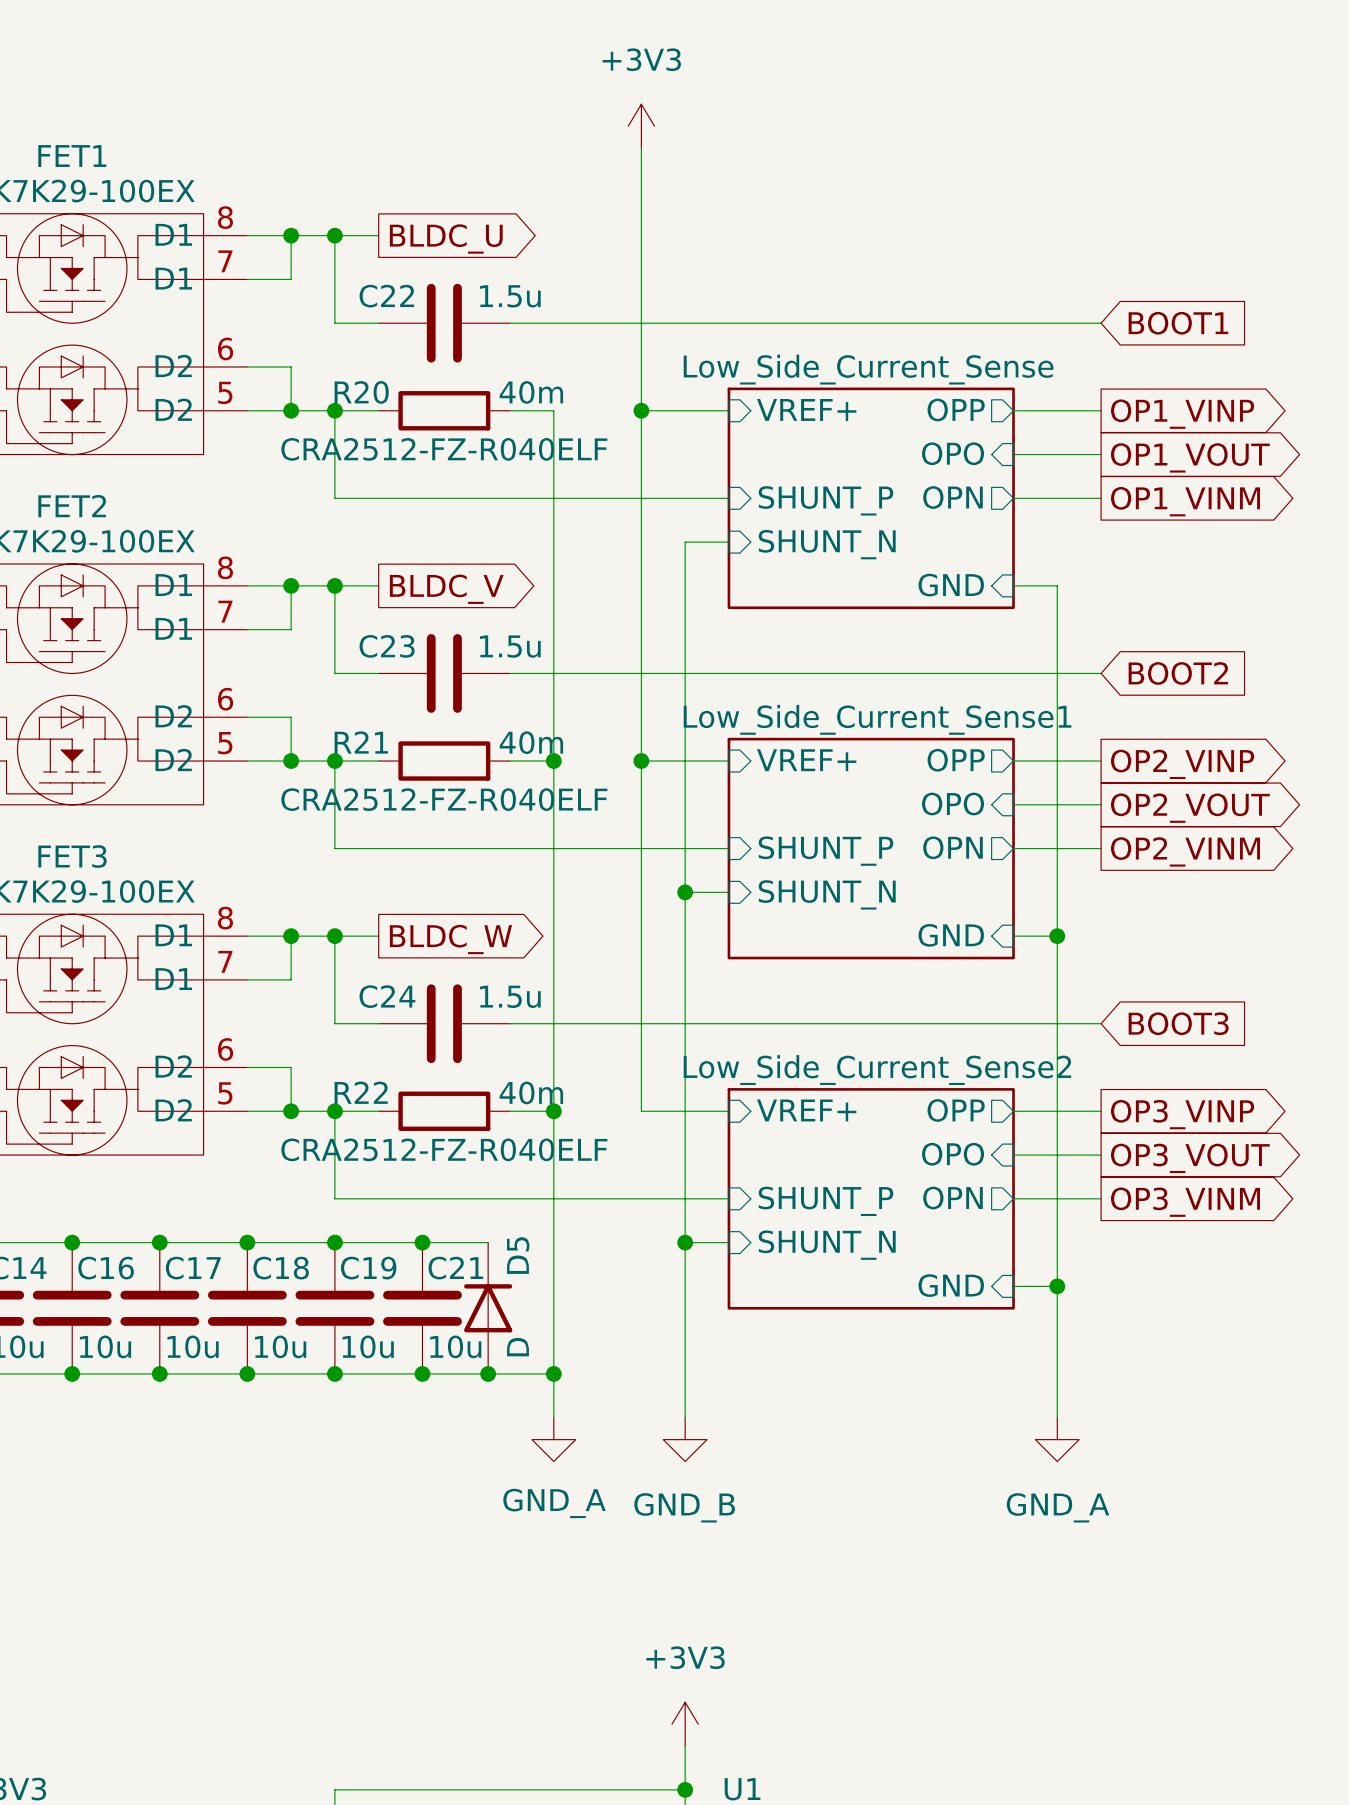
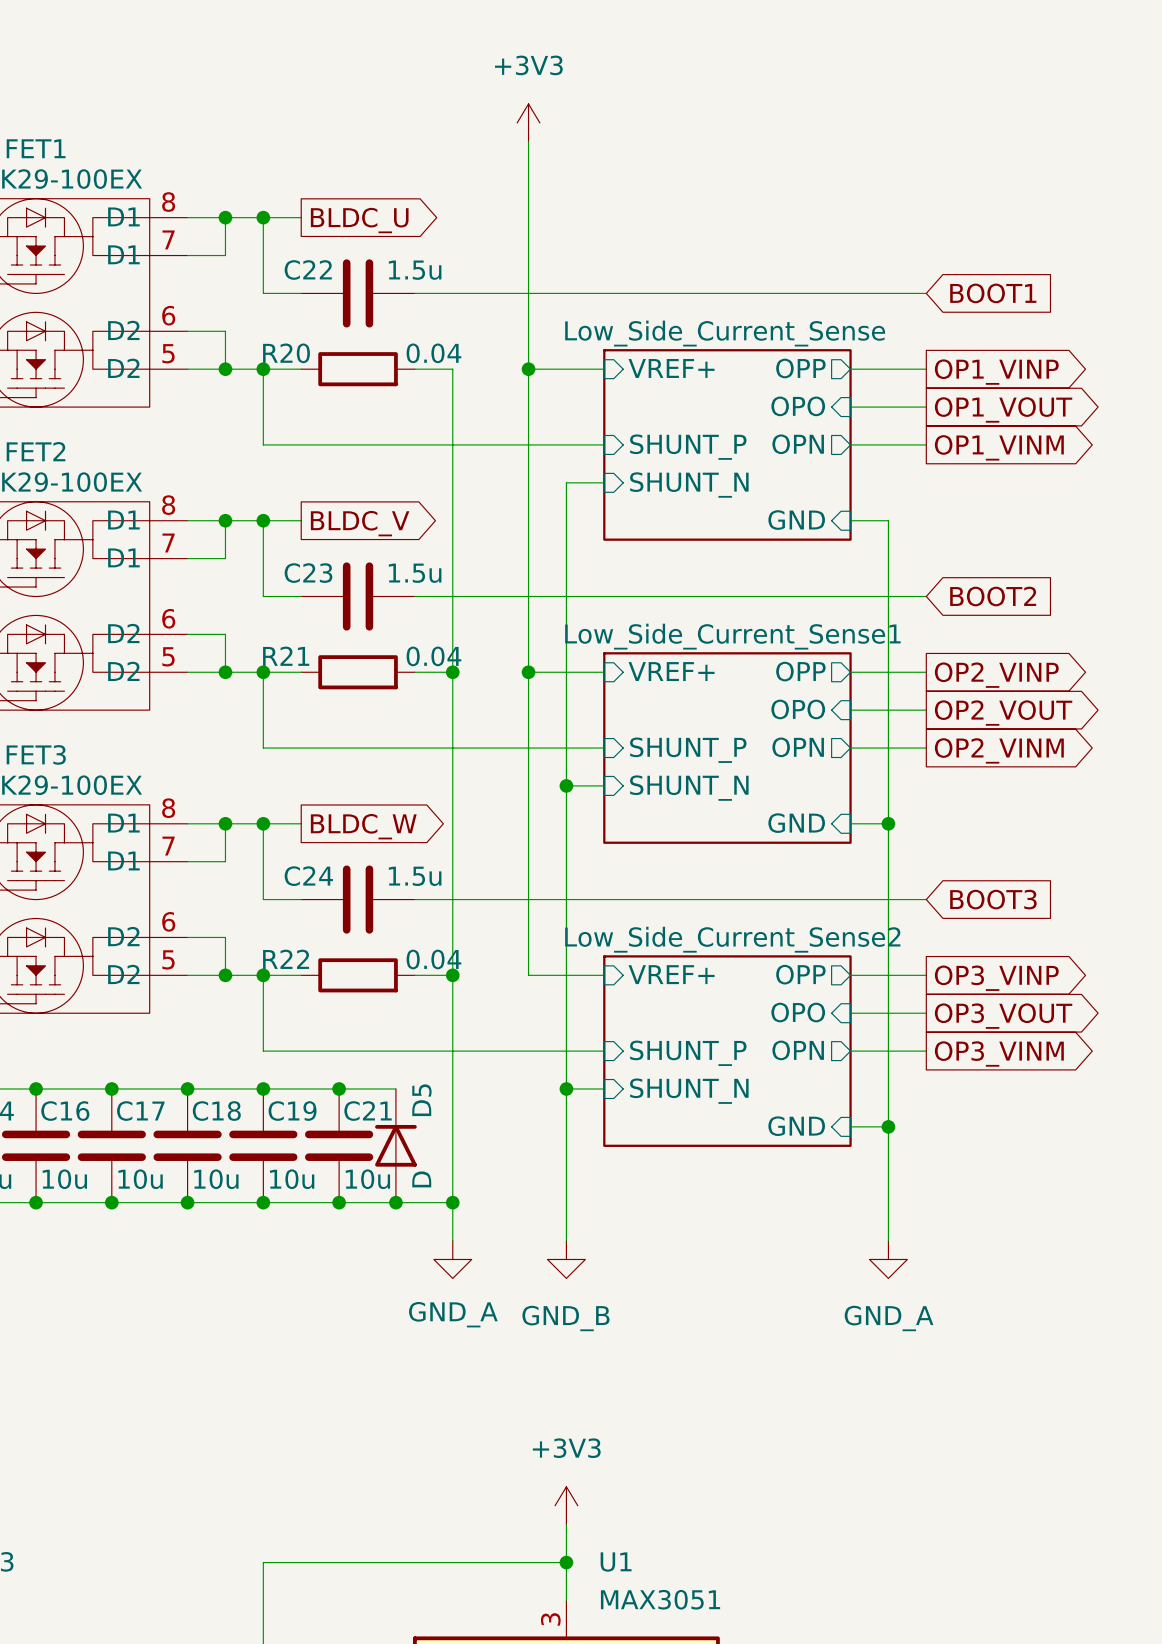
R20 value: 40m (531, 392) -> 0.04 (433, 353)
R20 text: CRA2512-FZ-R040ELF (444, 449) -> none
R21 value: 40m (531, 742) -> 0.04 (433, 656)
R21 text: CRA2512-FZ-R040ELF (444, 799) -> none
R22 value: 40m (531, 1092) -> 0.04 (433, 959)
R22 text: CRA2512-FZ-R040ELF (444, 1149) -> none

